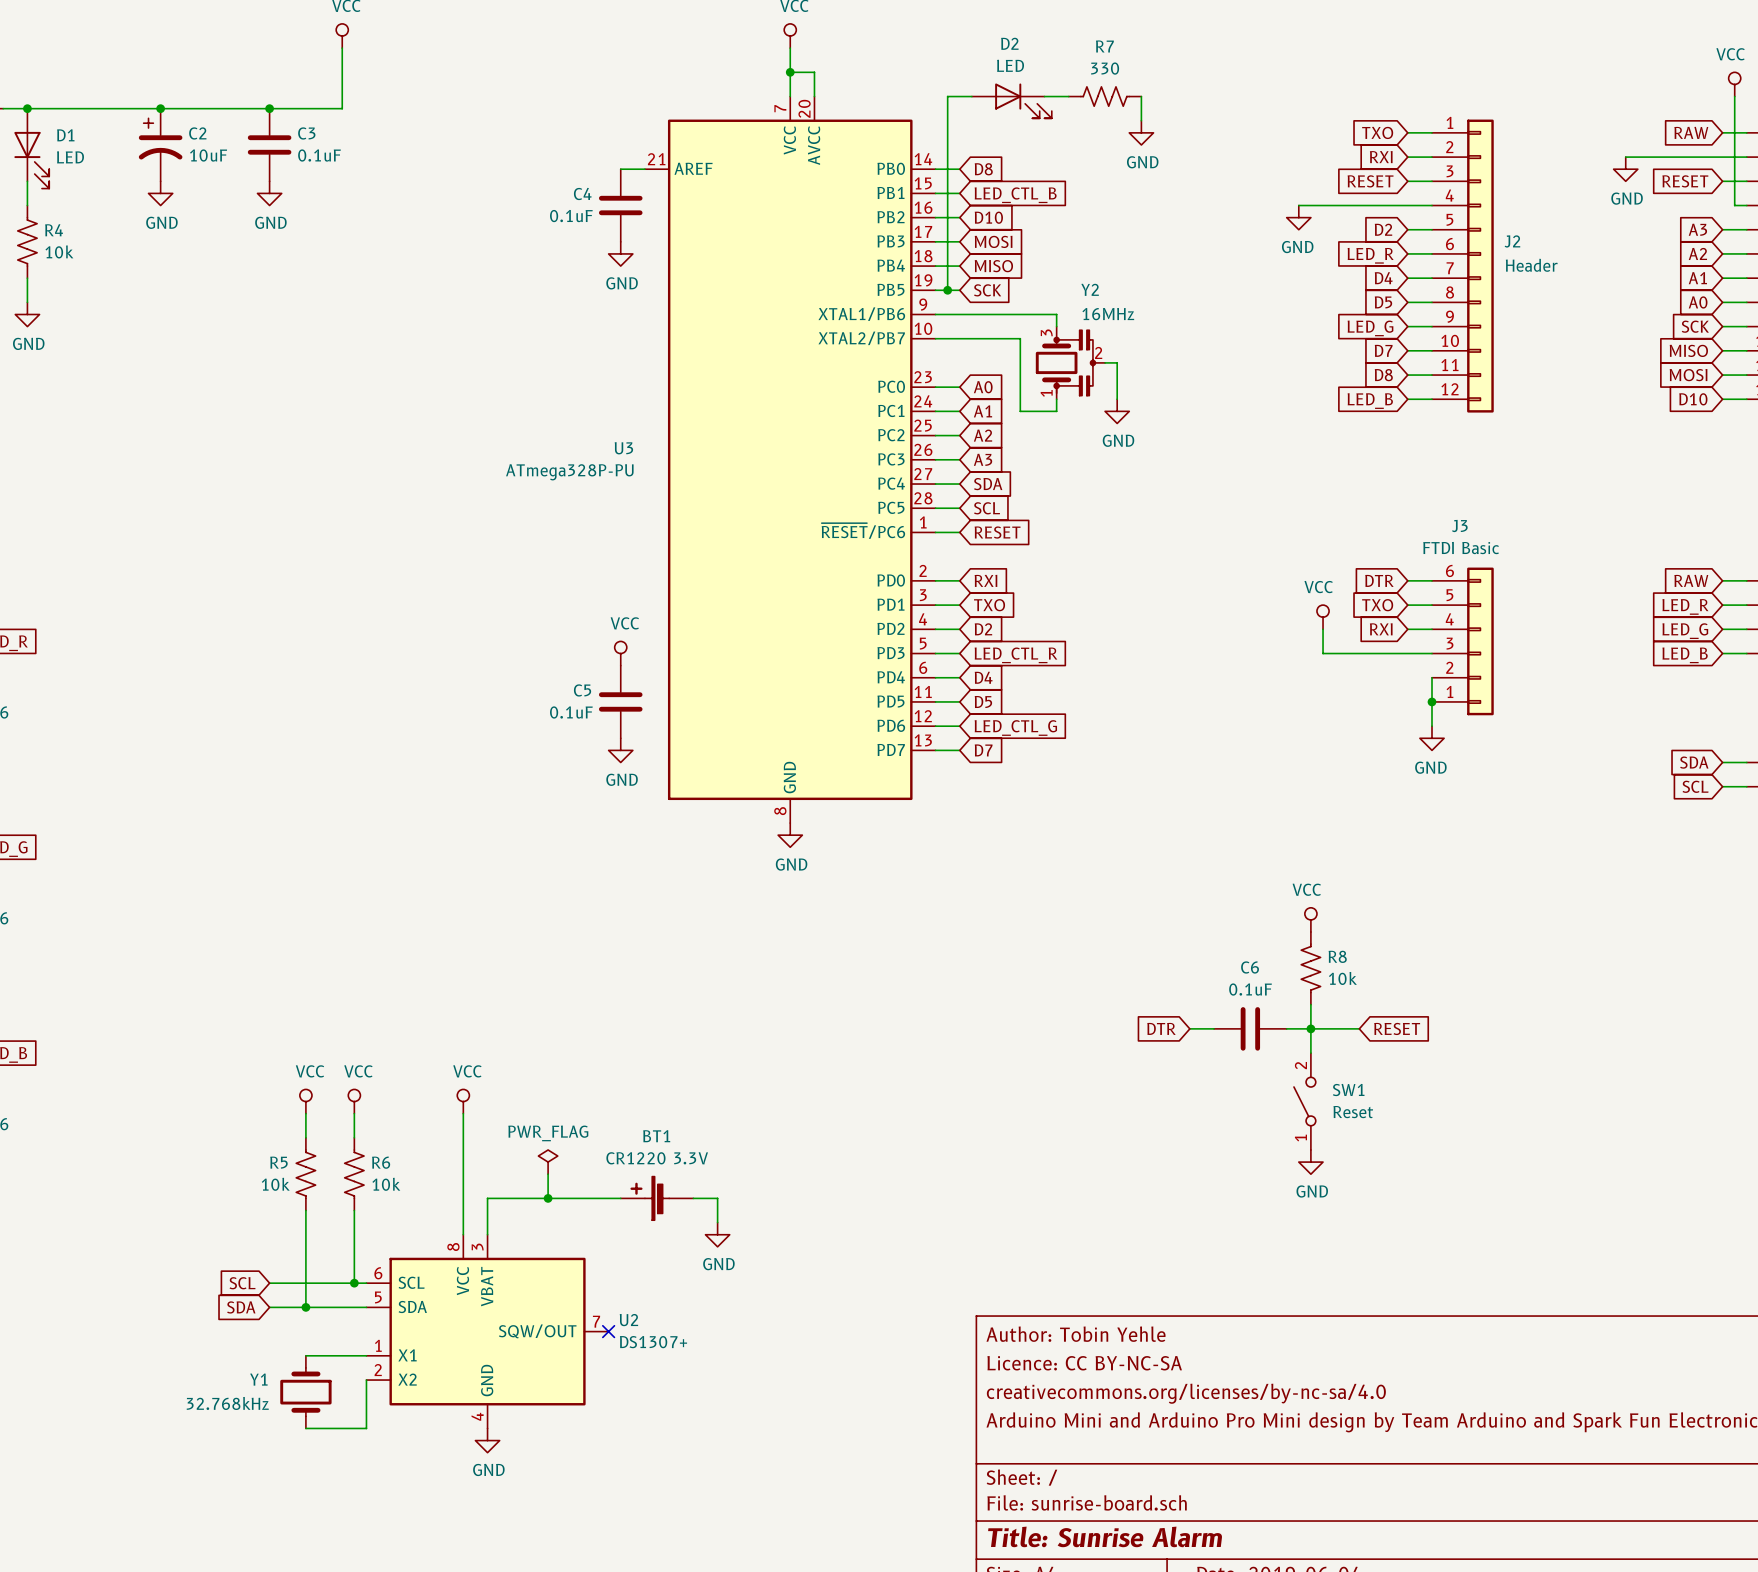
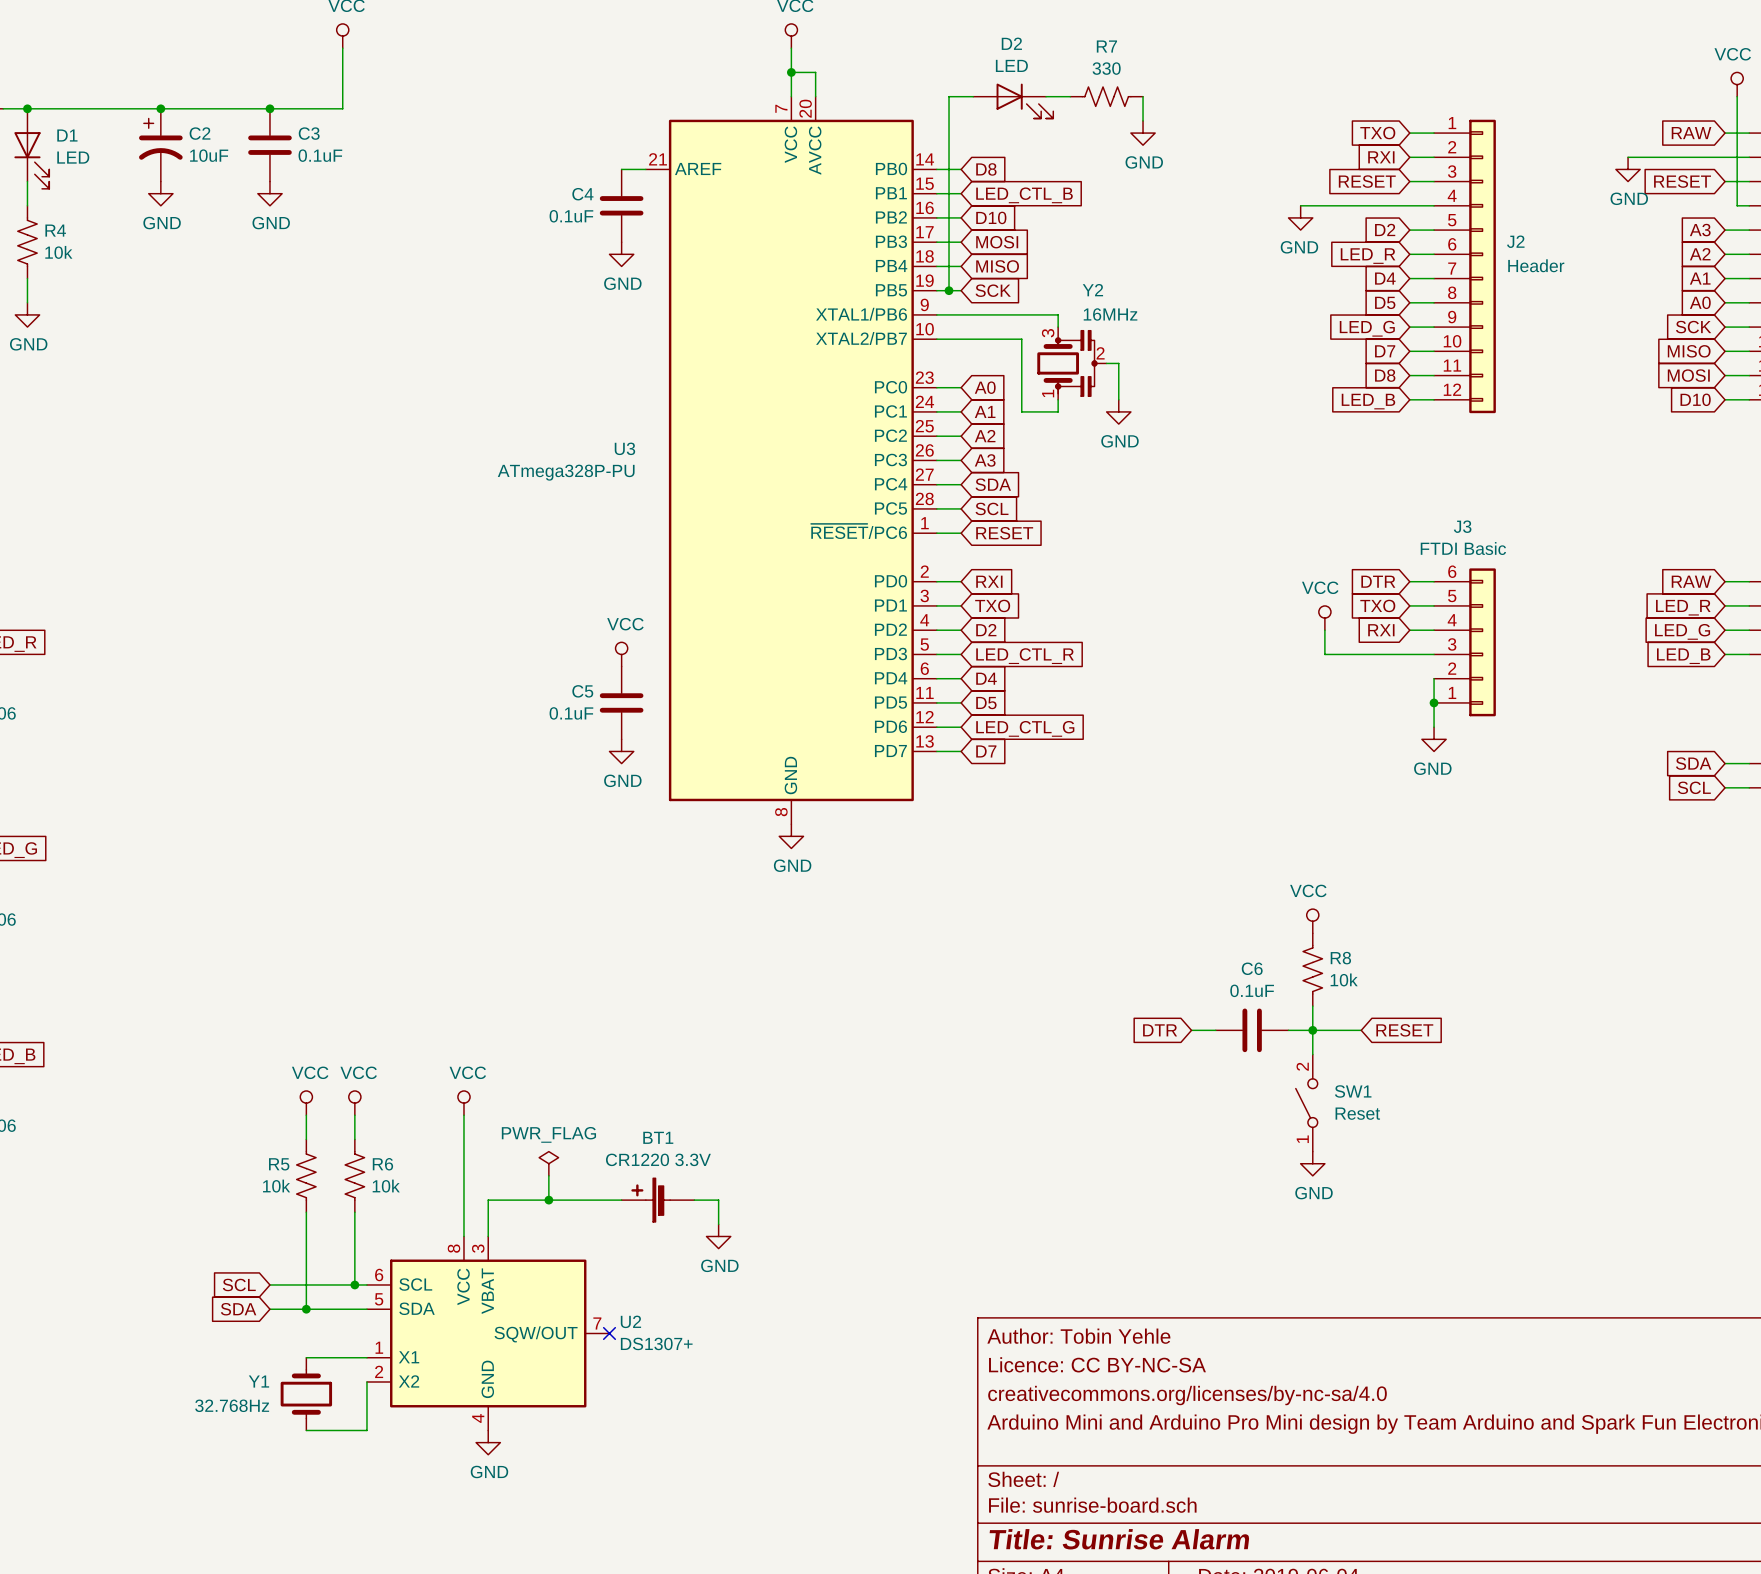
Y1 value: 32.768kHz (227, 1403) -> 32.768Hz (232, 1405)

